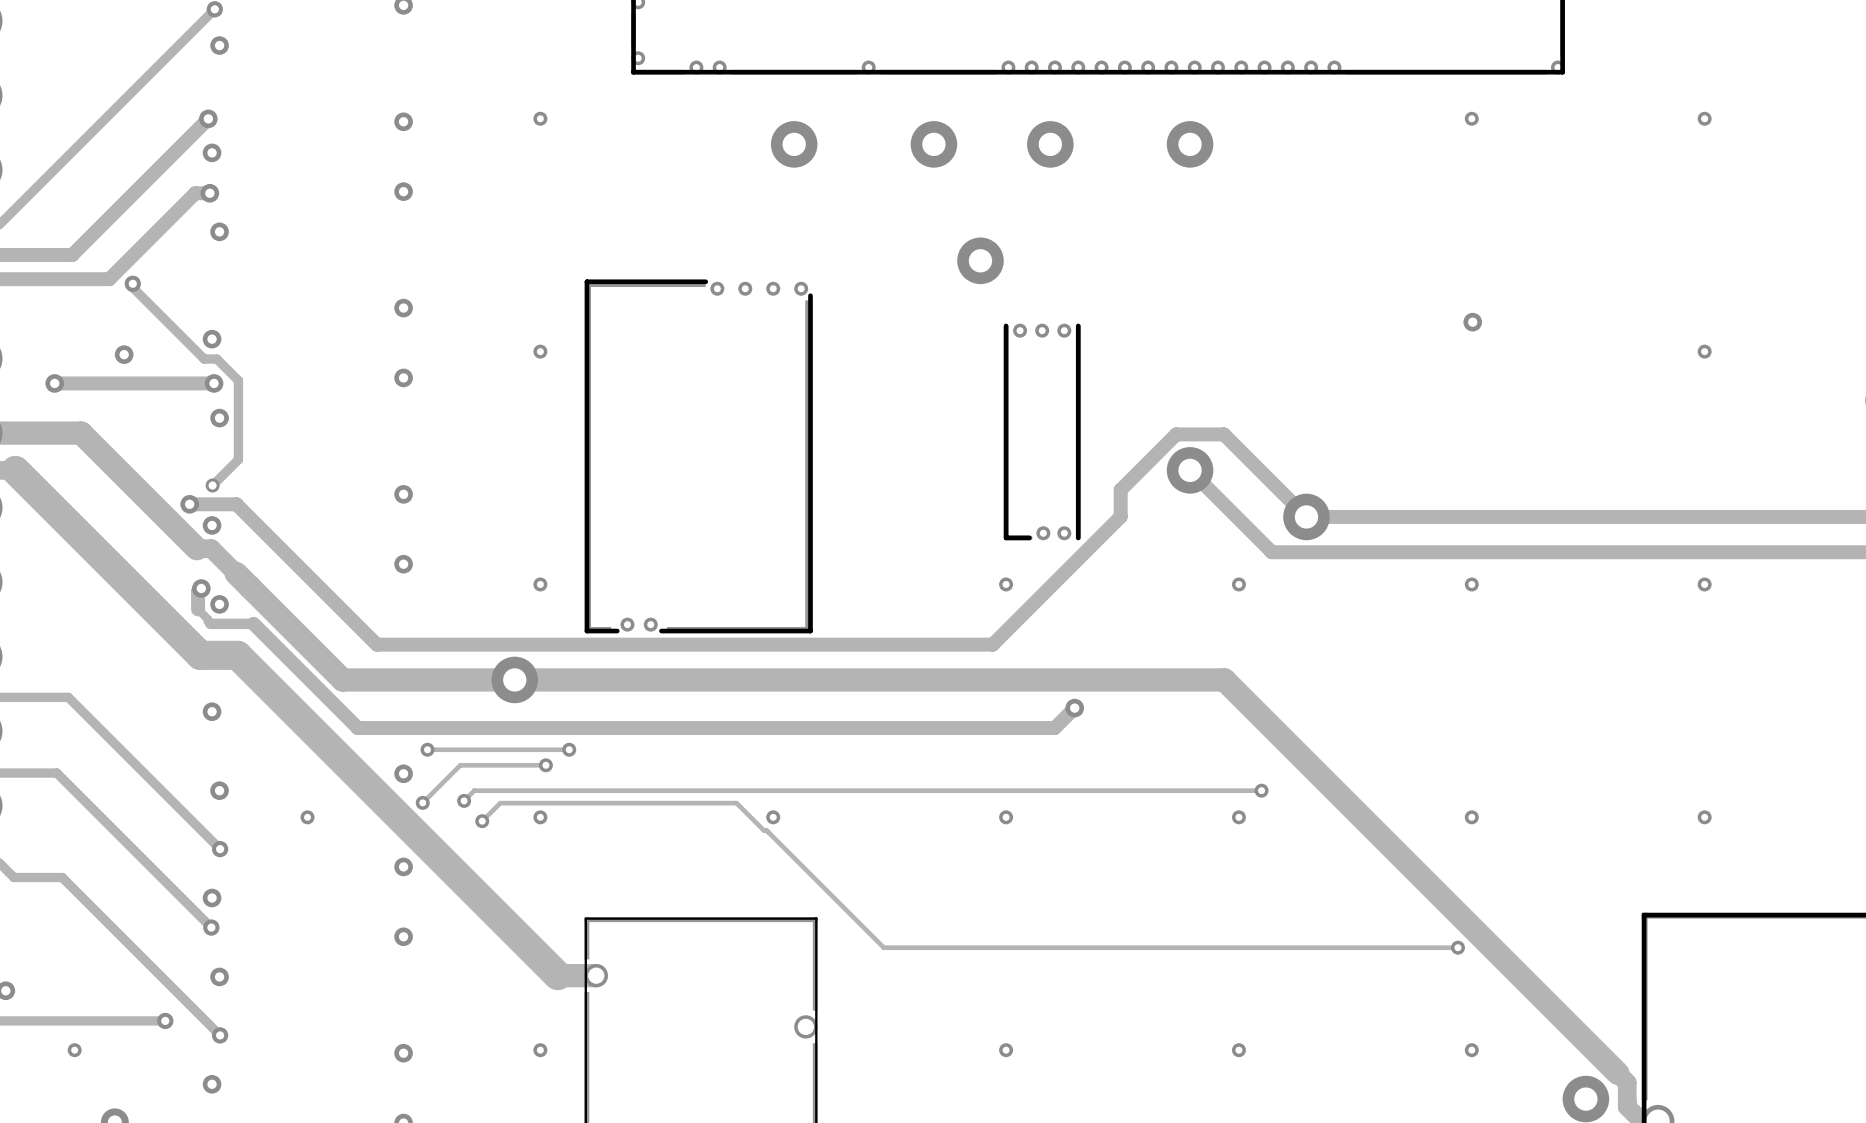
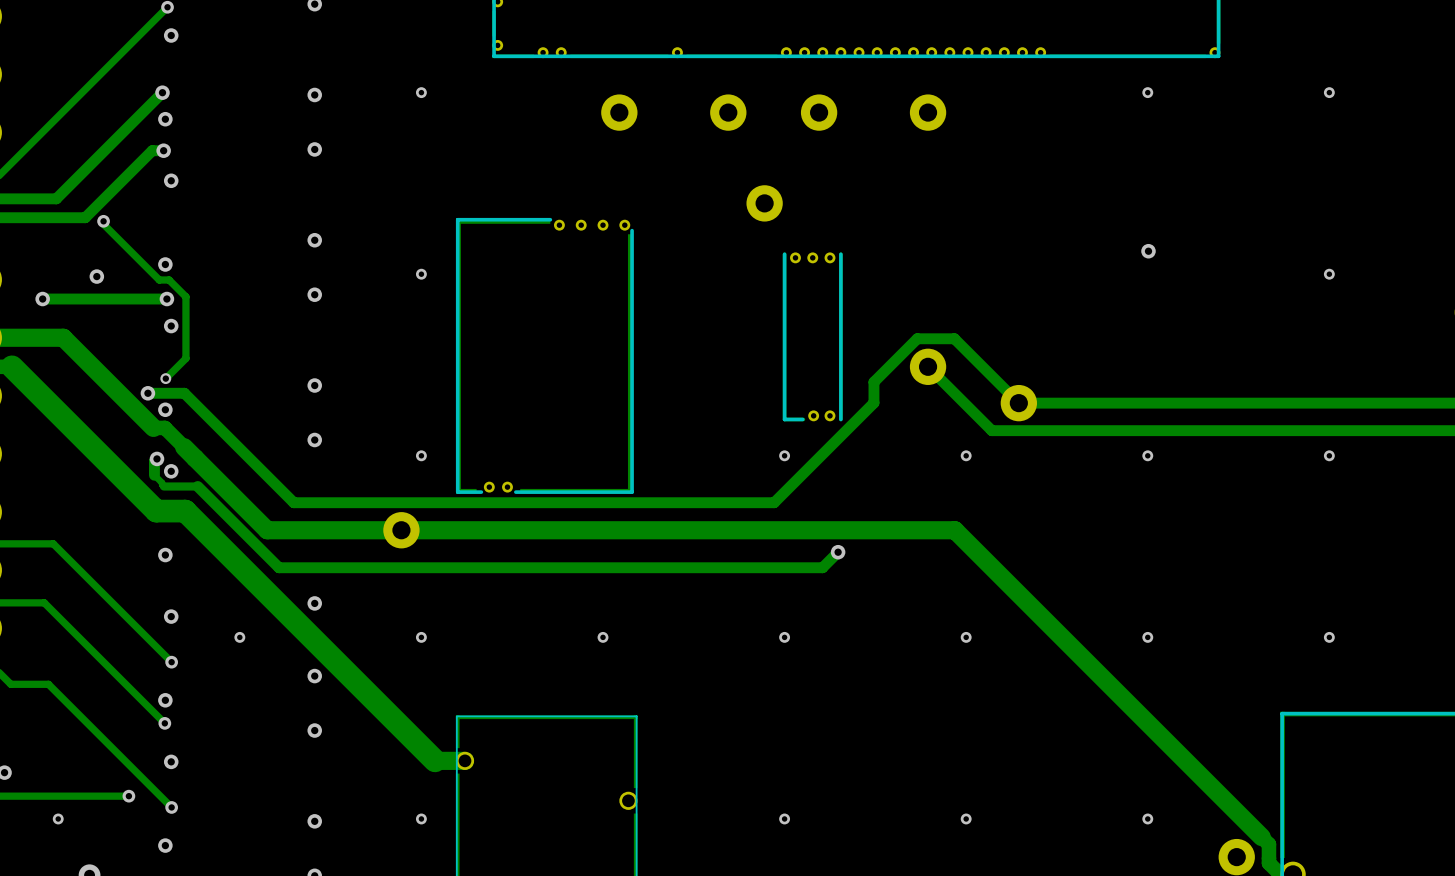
via: (427, 749) -> none
track: (569, 749) (427, 749) -> none
via: (569, 749) -> none
track: (545, 765) (460, 765) (422, 802) -> none
via: (545, 765) -> none
track: (1261, 790) (474, 790) (464, 800) -> none
via: (1261, 790) -> none
via: (464, 800) -> none
via: (422, 802) -> none
track: (482, 821) (500, 803) (736, 803) (763, 830) (766, 830) (883, 947) (1458, 947) -> none
via: (482, 821) -> none
via: (1458, 947) -> none

